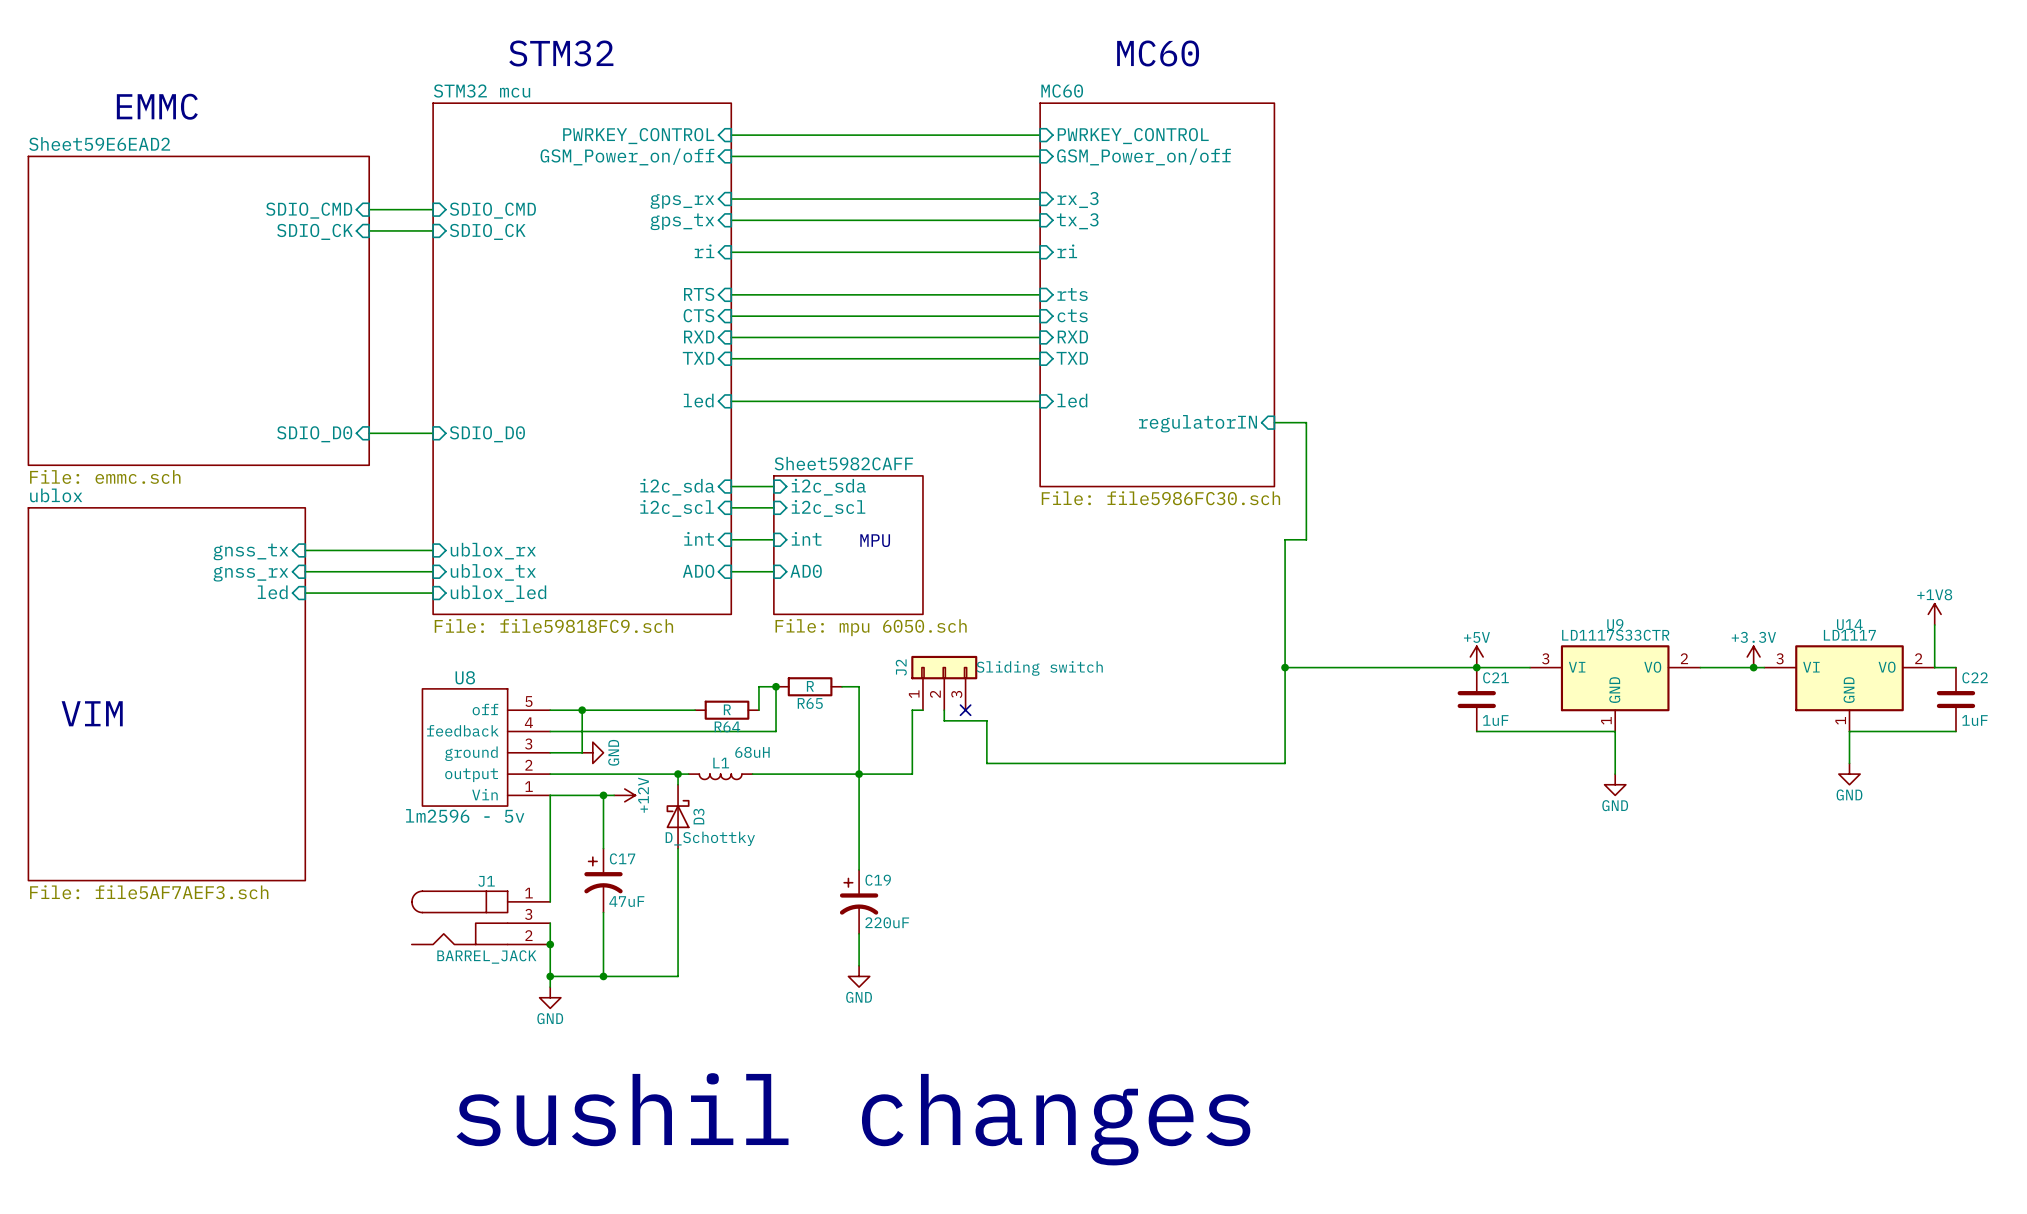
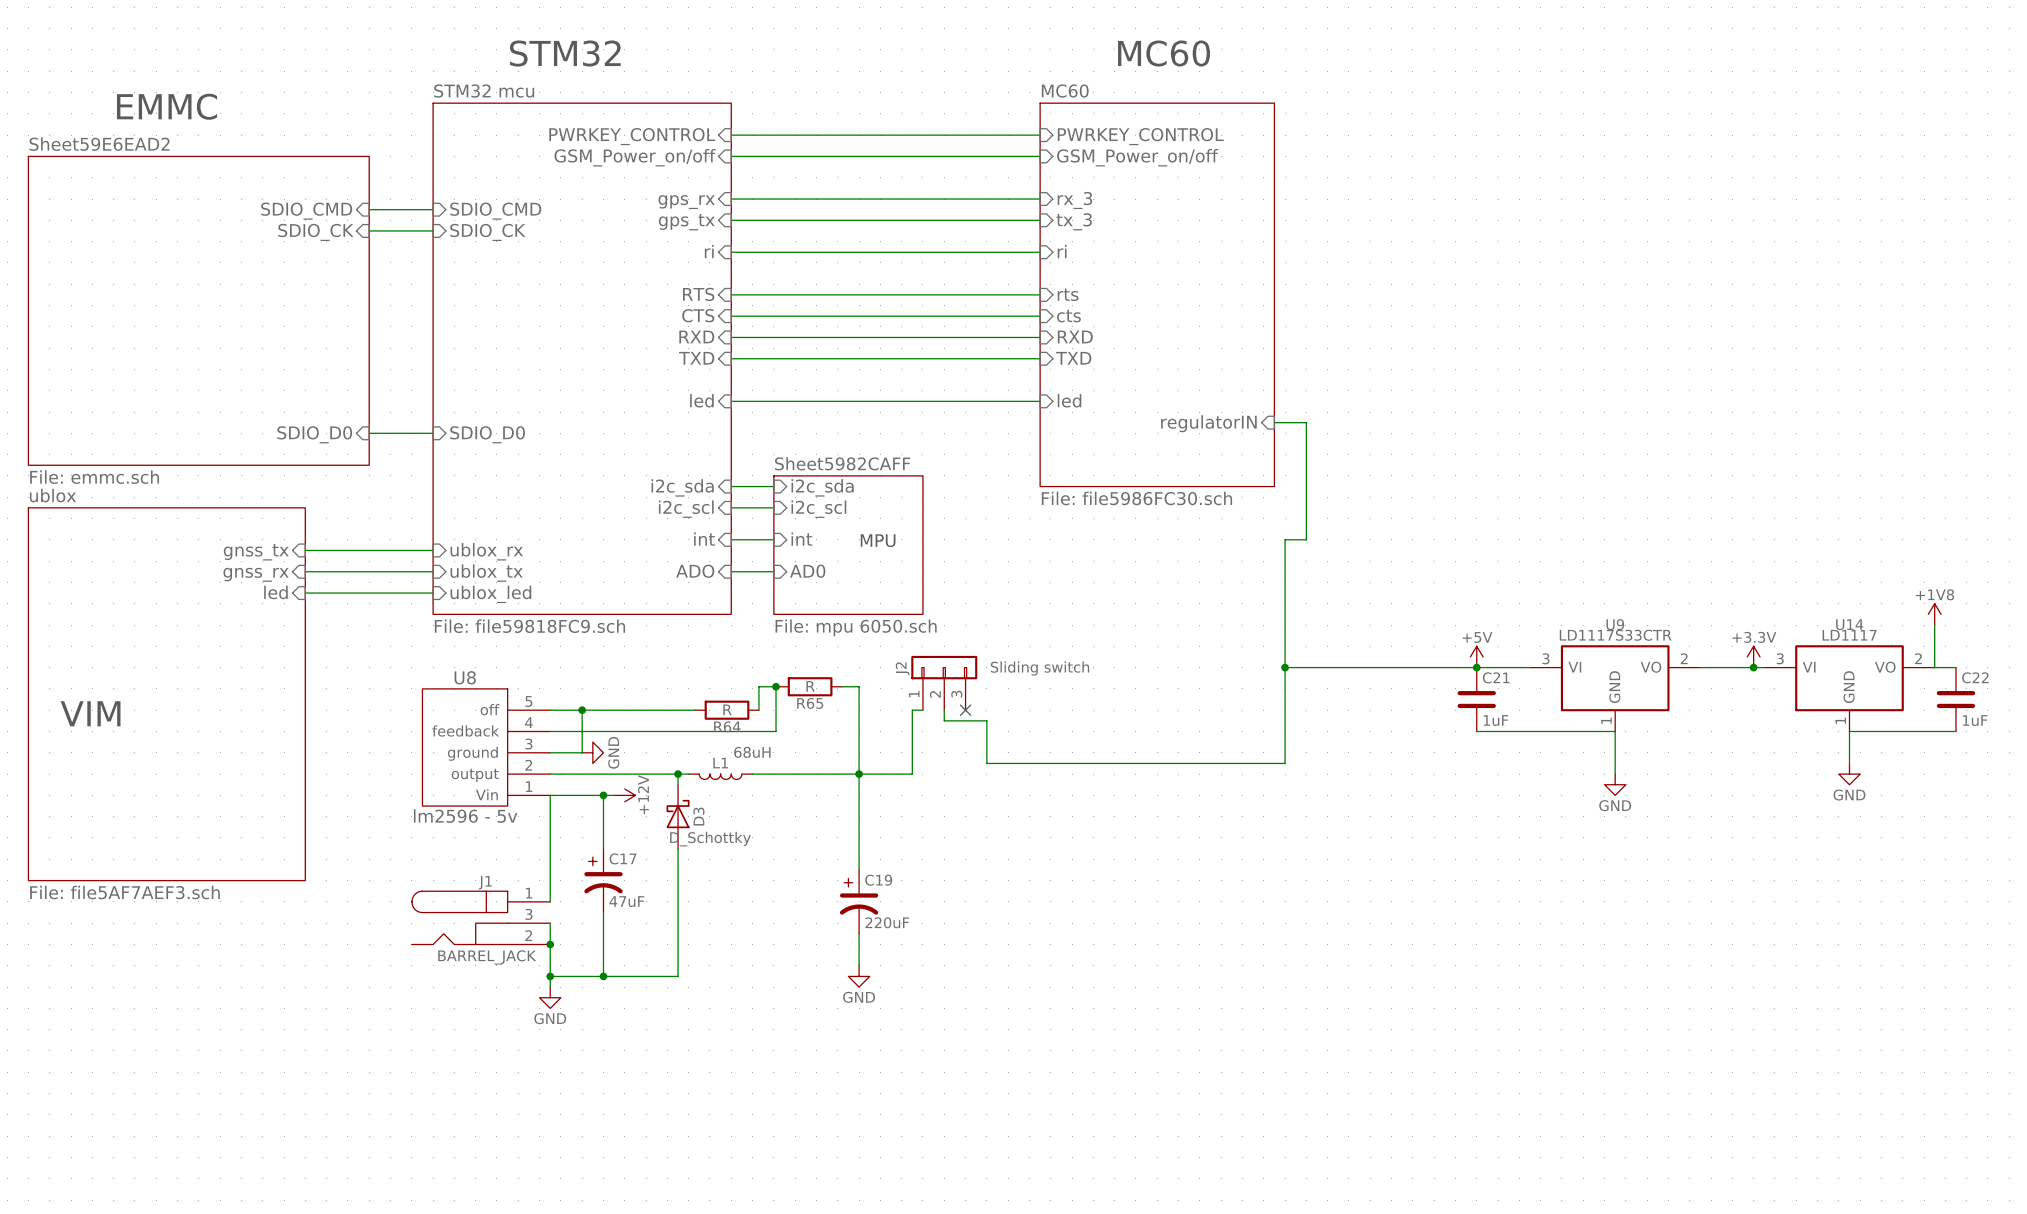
text: sushil changes (853, 1119) -> none

